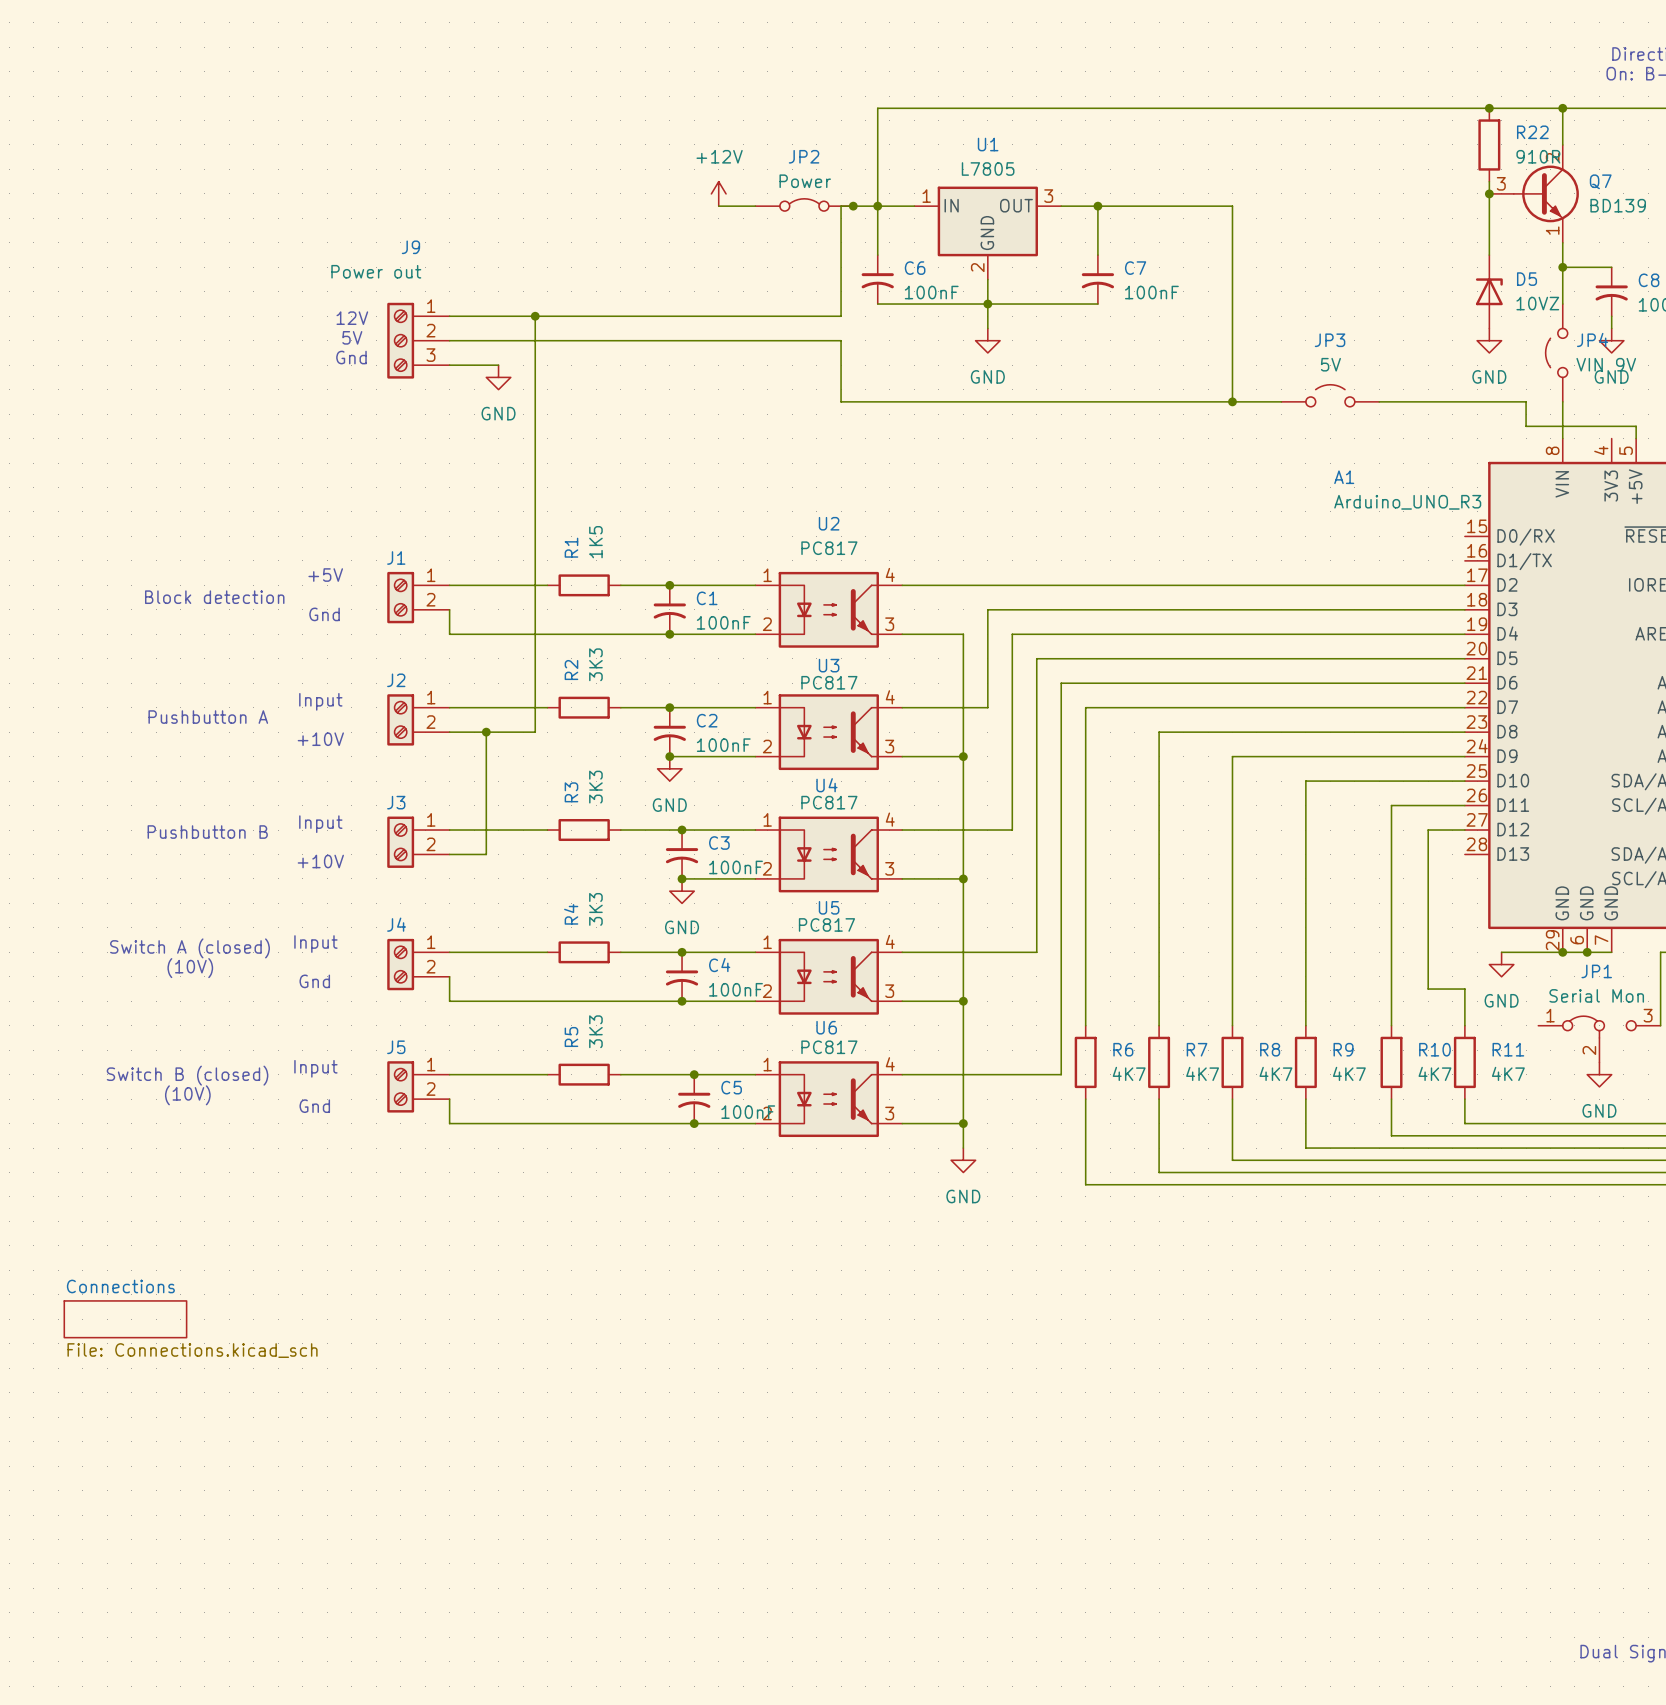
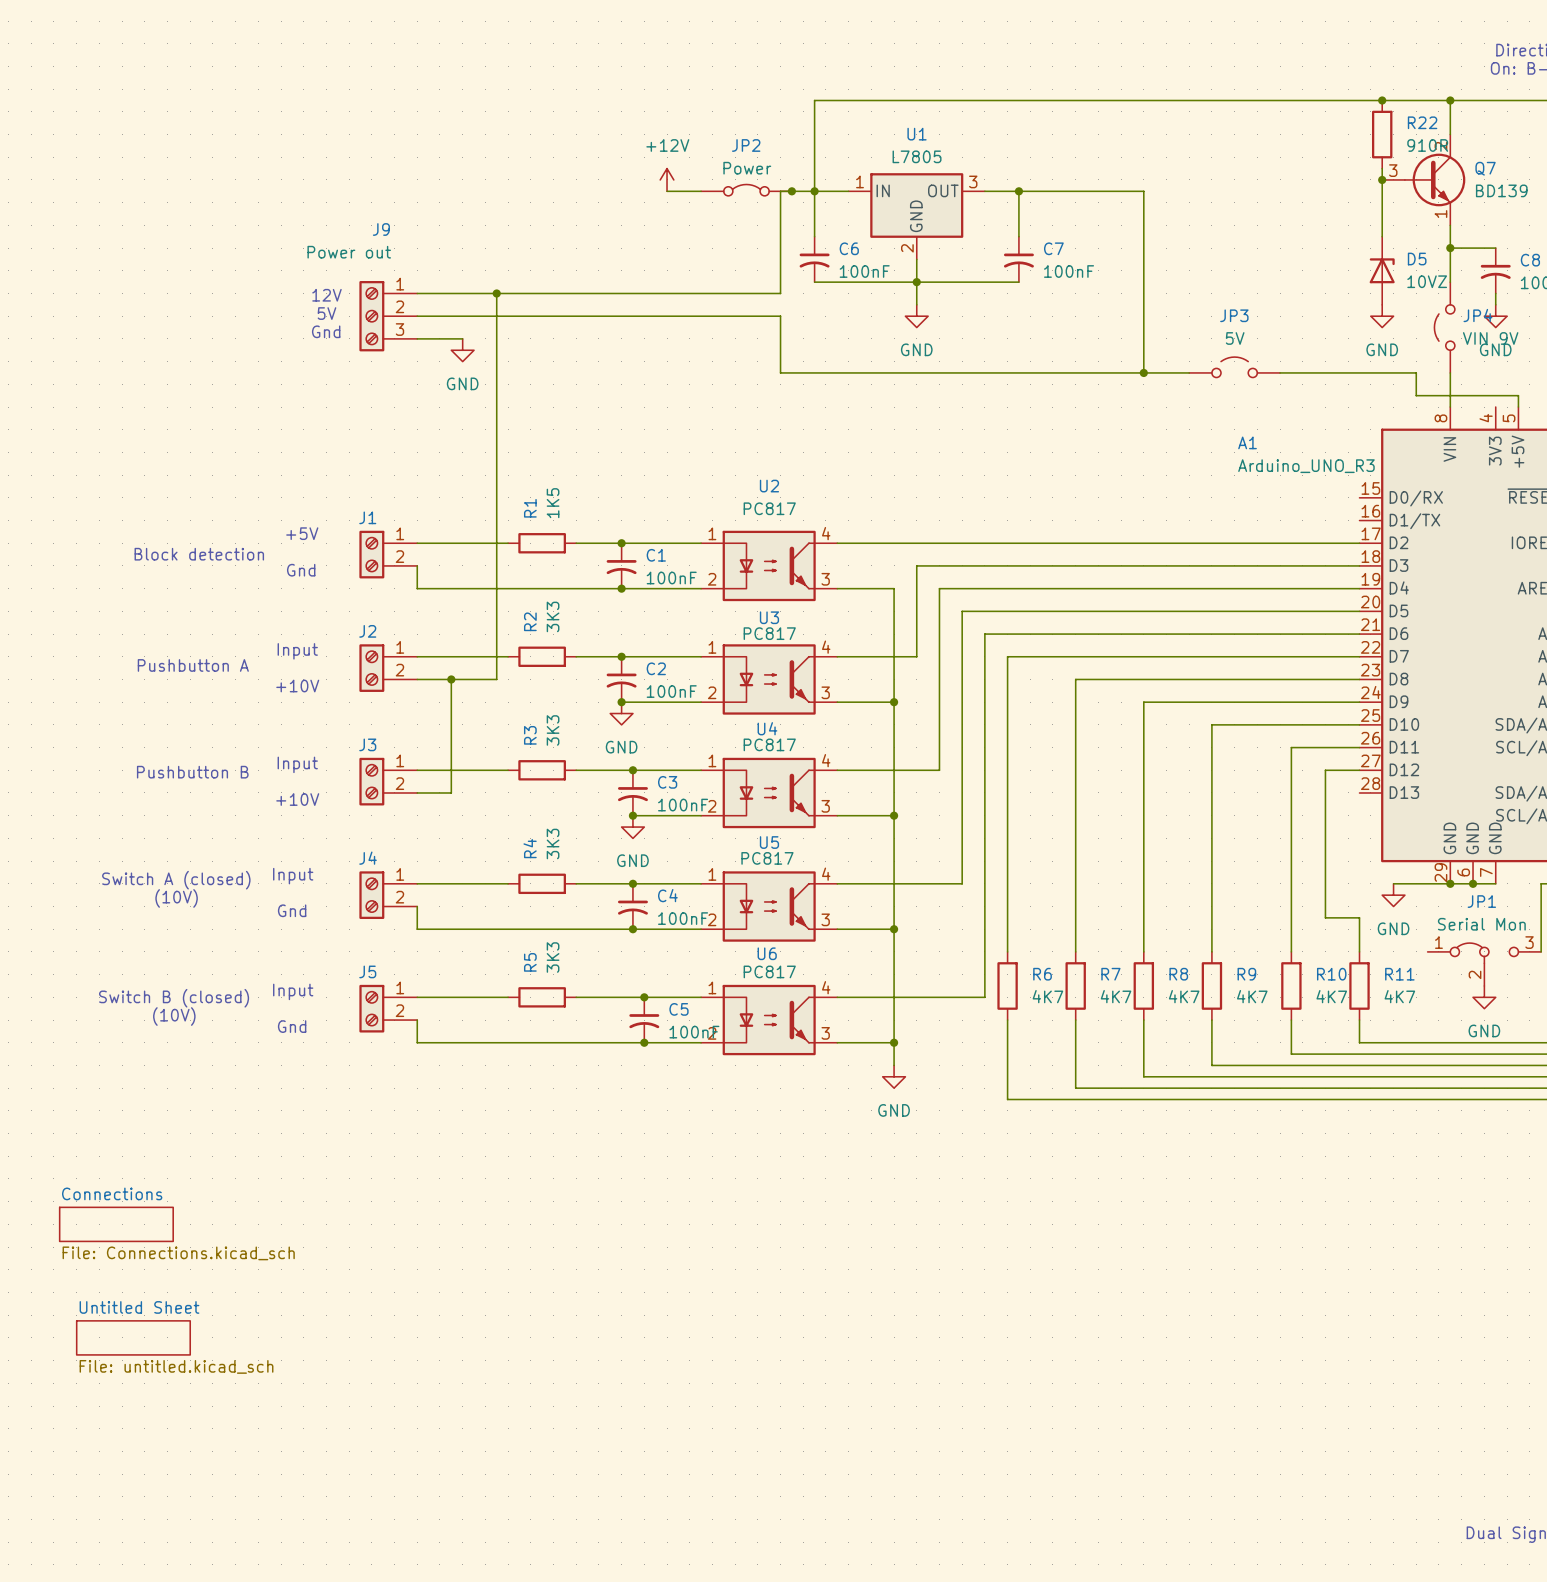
sheet Untitled Sheet: none -> File: untitled.kicad_sch (133, 1337)

